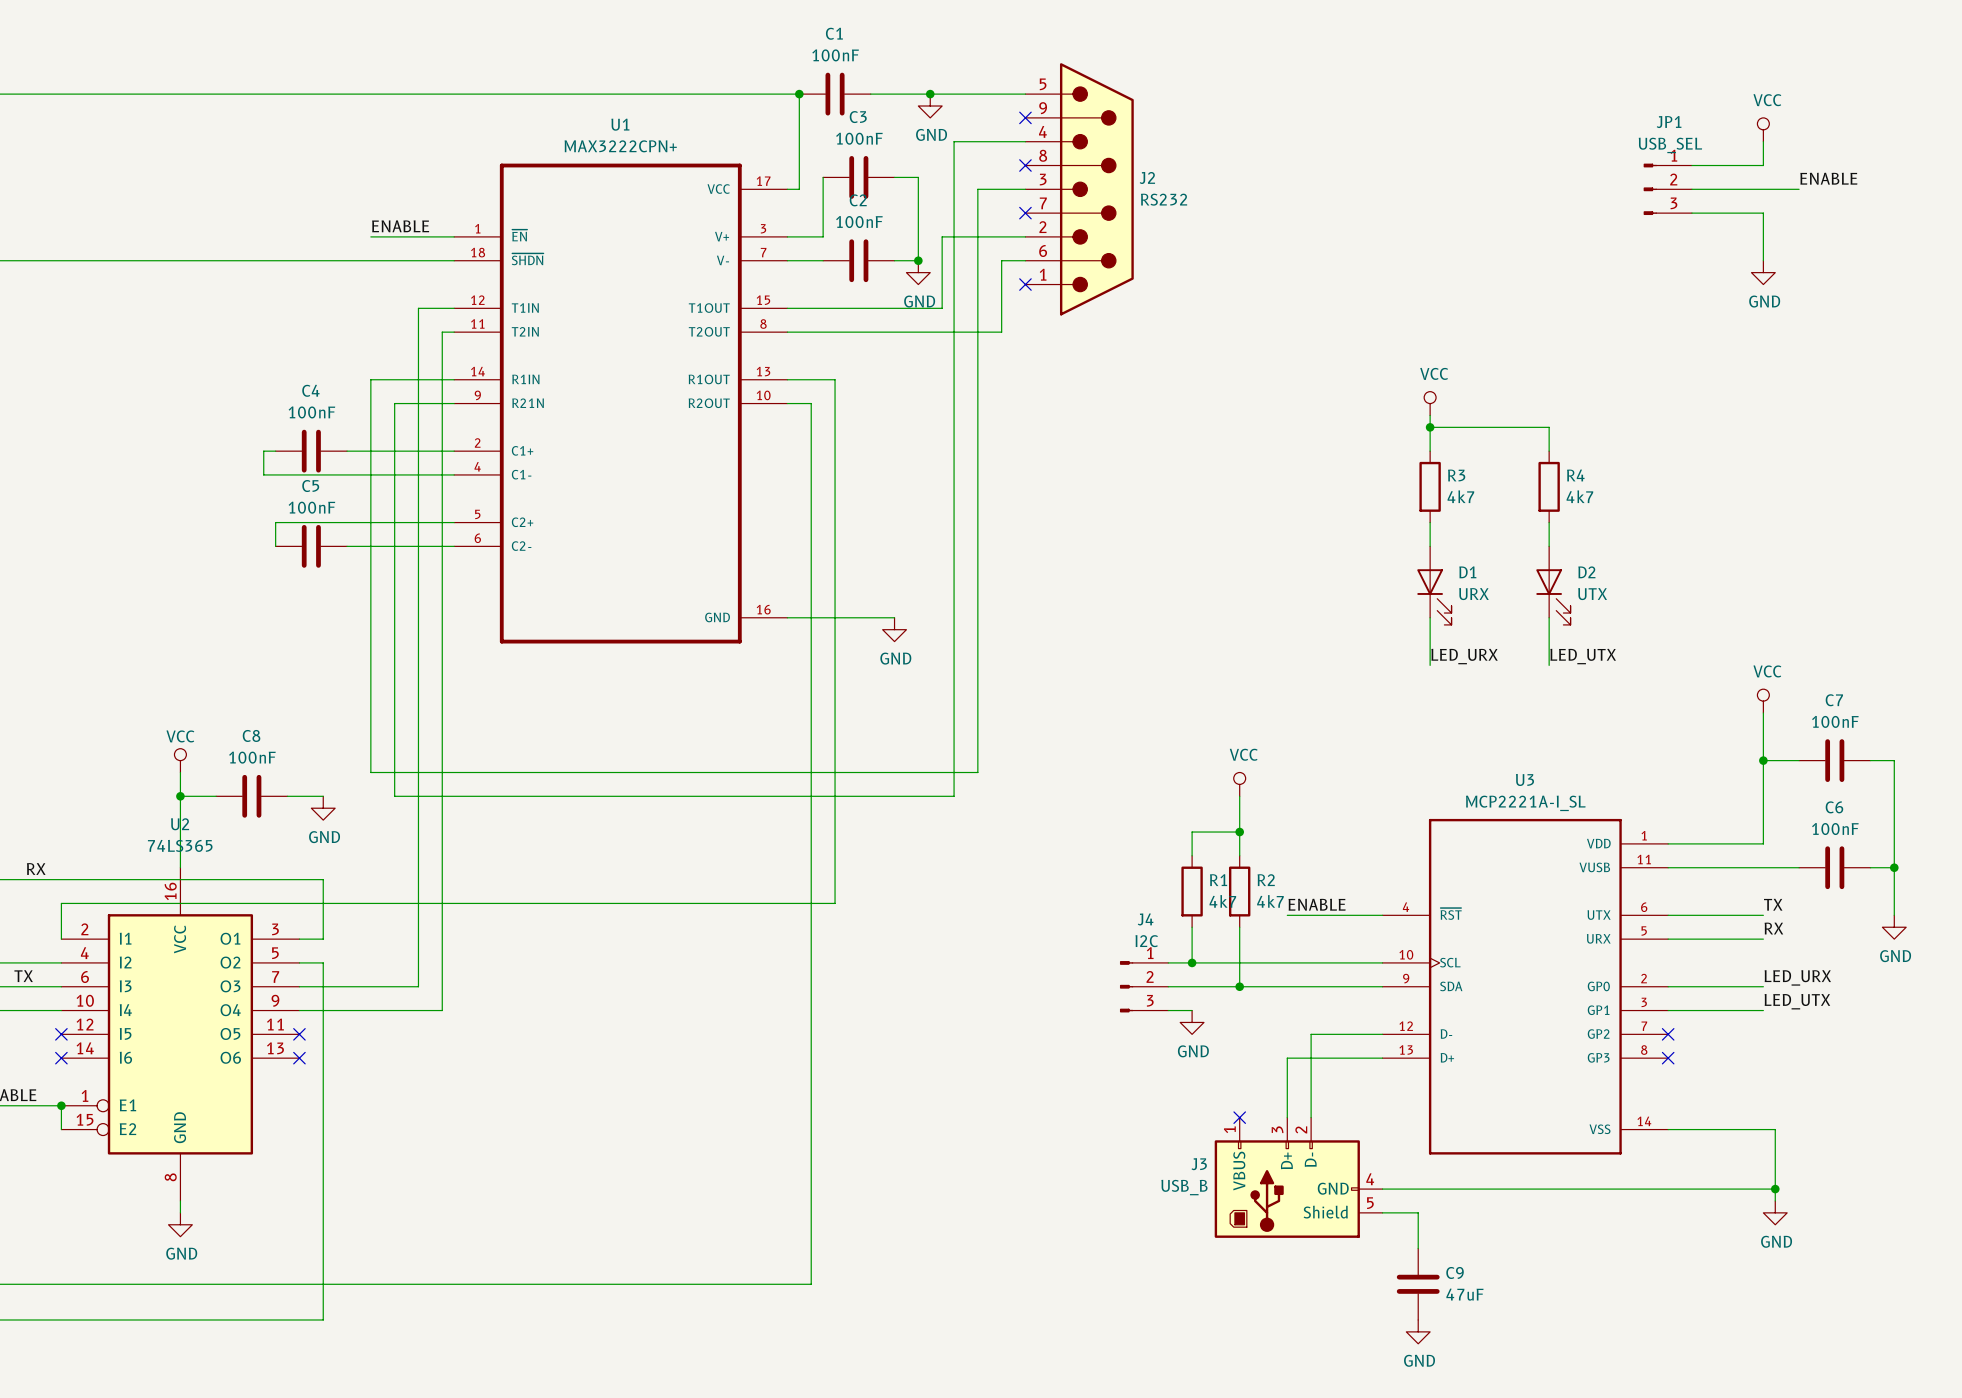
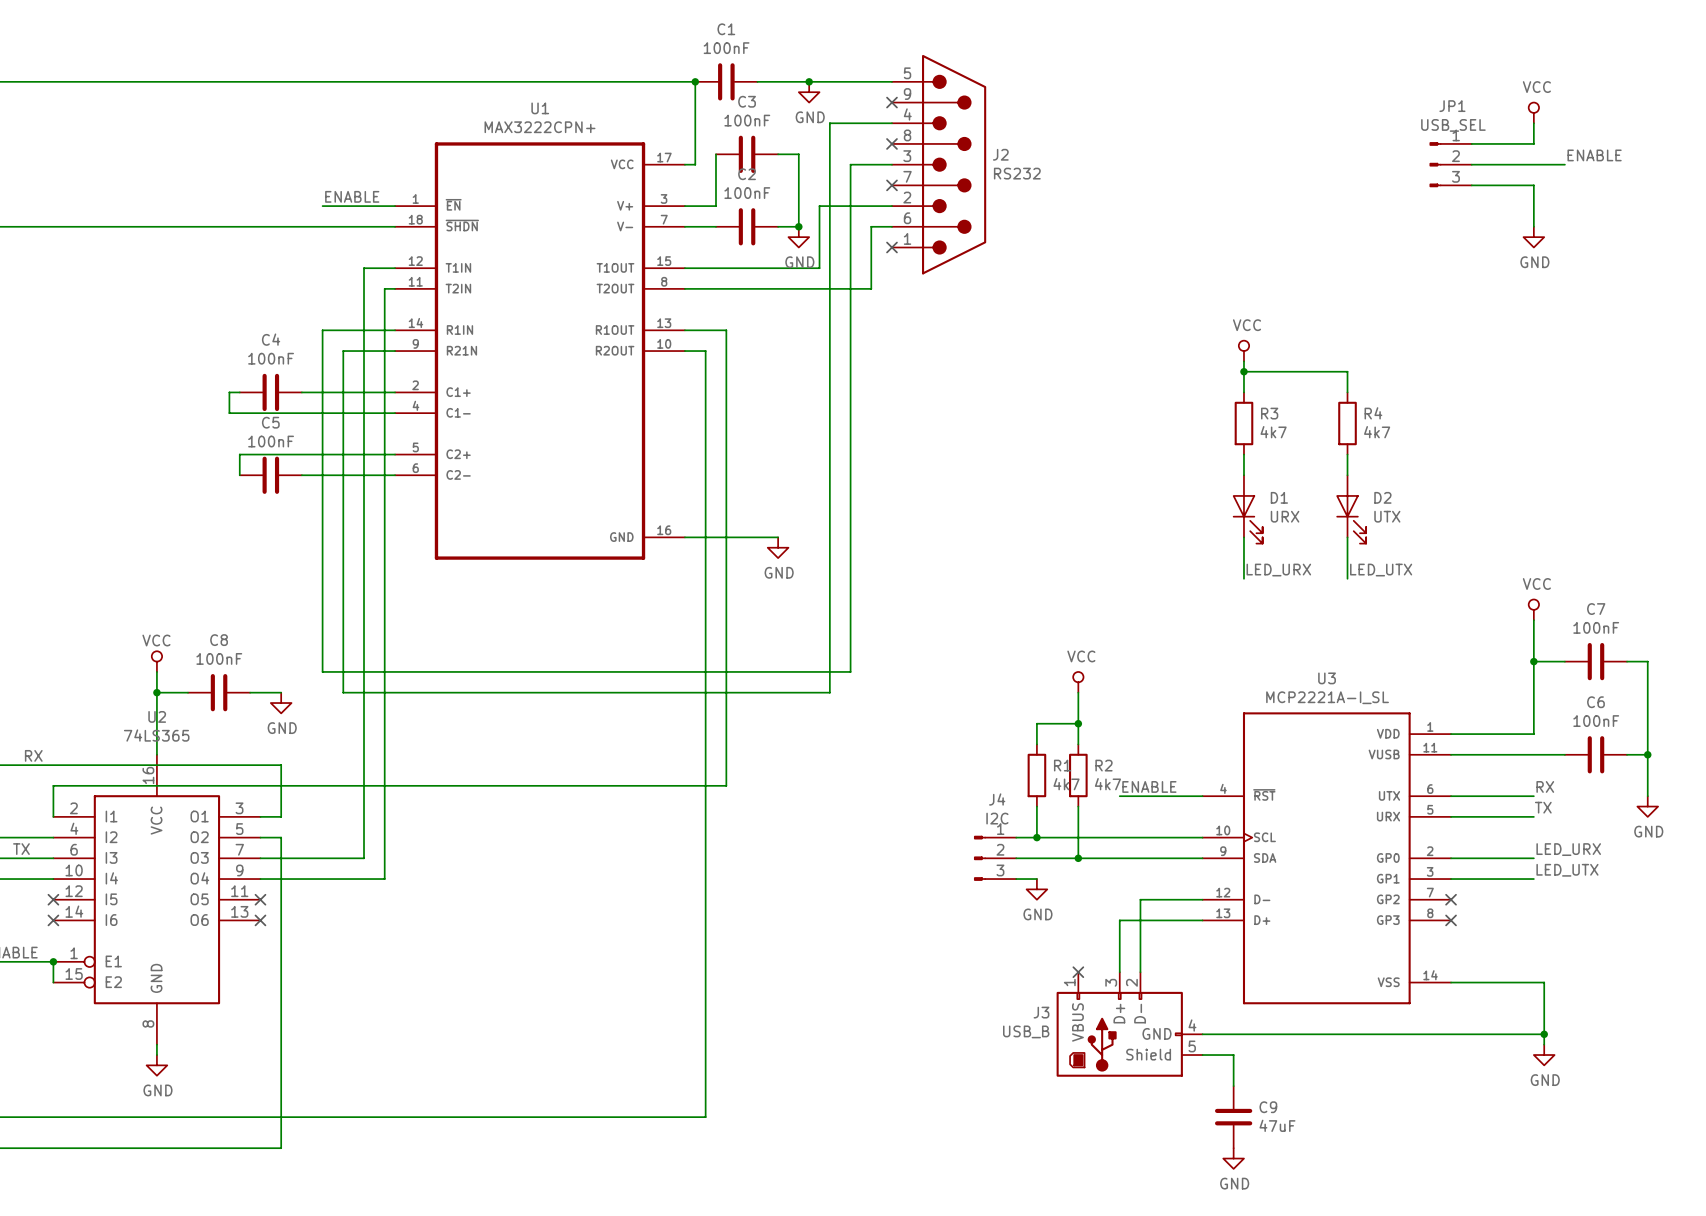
label: TX (1773, 904) -> RX (1545, 786)
label: RX (1773, 928) -> TX (1543, 807)

